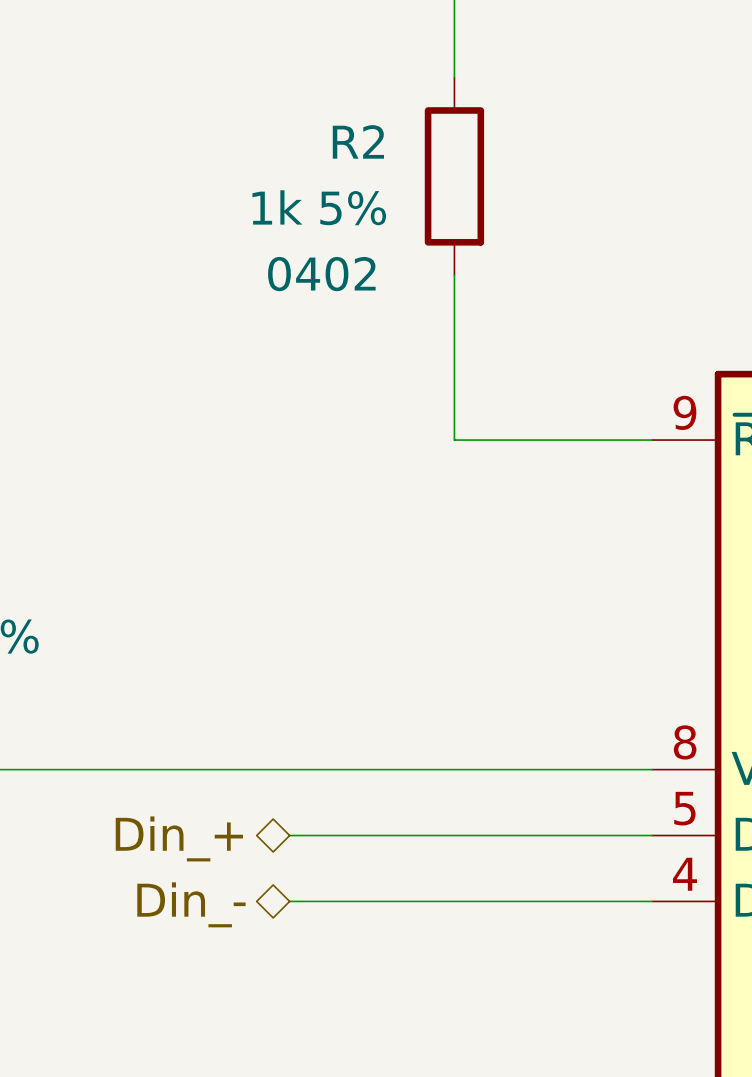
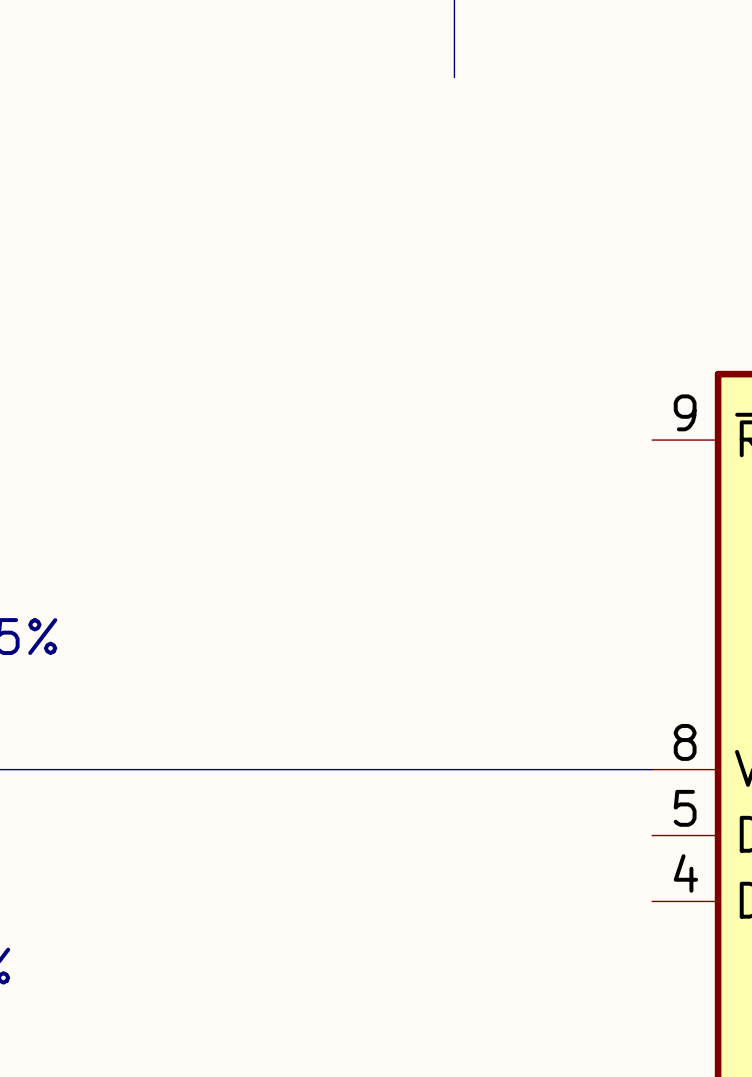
R2: 1k 5% (454, 176) -> none
wire: (454, 275) (454, 440) (652, 440) -> none
wire: (289, 835) (652, 835) -> none
hierarchical label: Din_+ (179, 838) -> none
wire: (289, 901) (652, 901) -> none
hierarchical label: Din_- (191, 904) -> none

